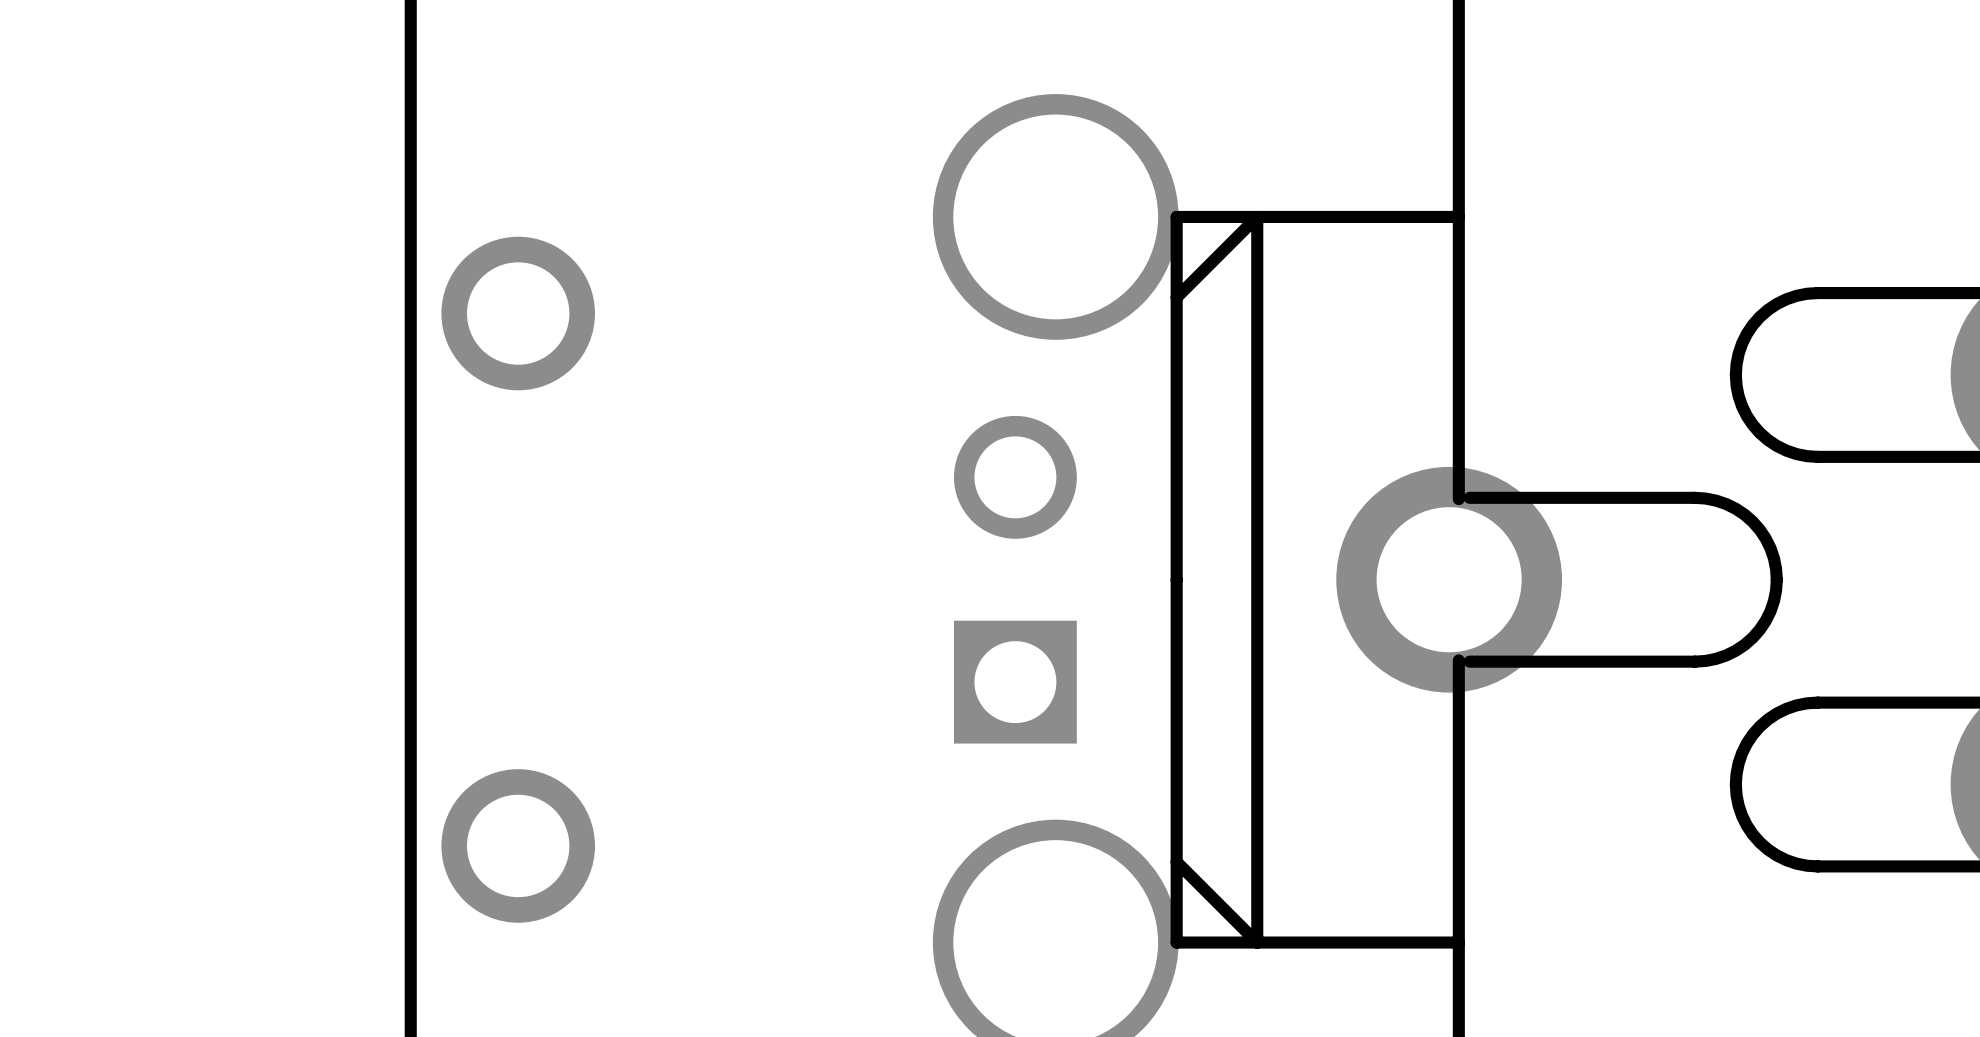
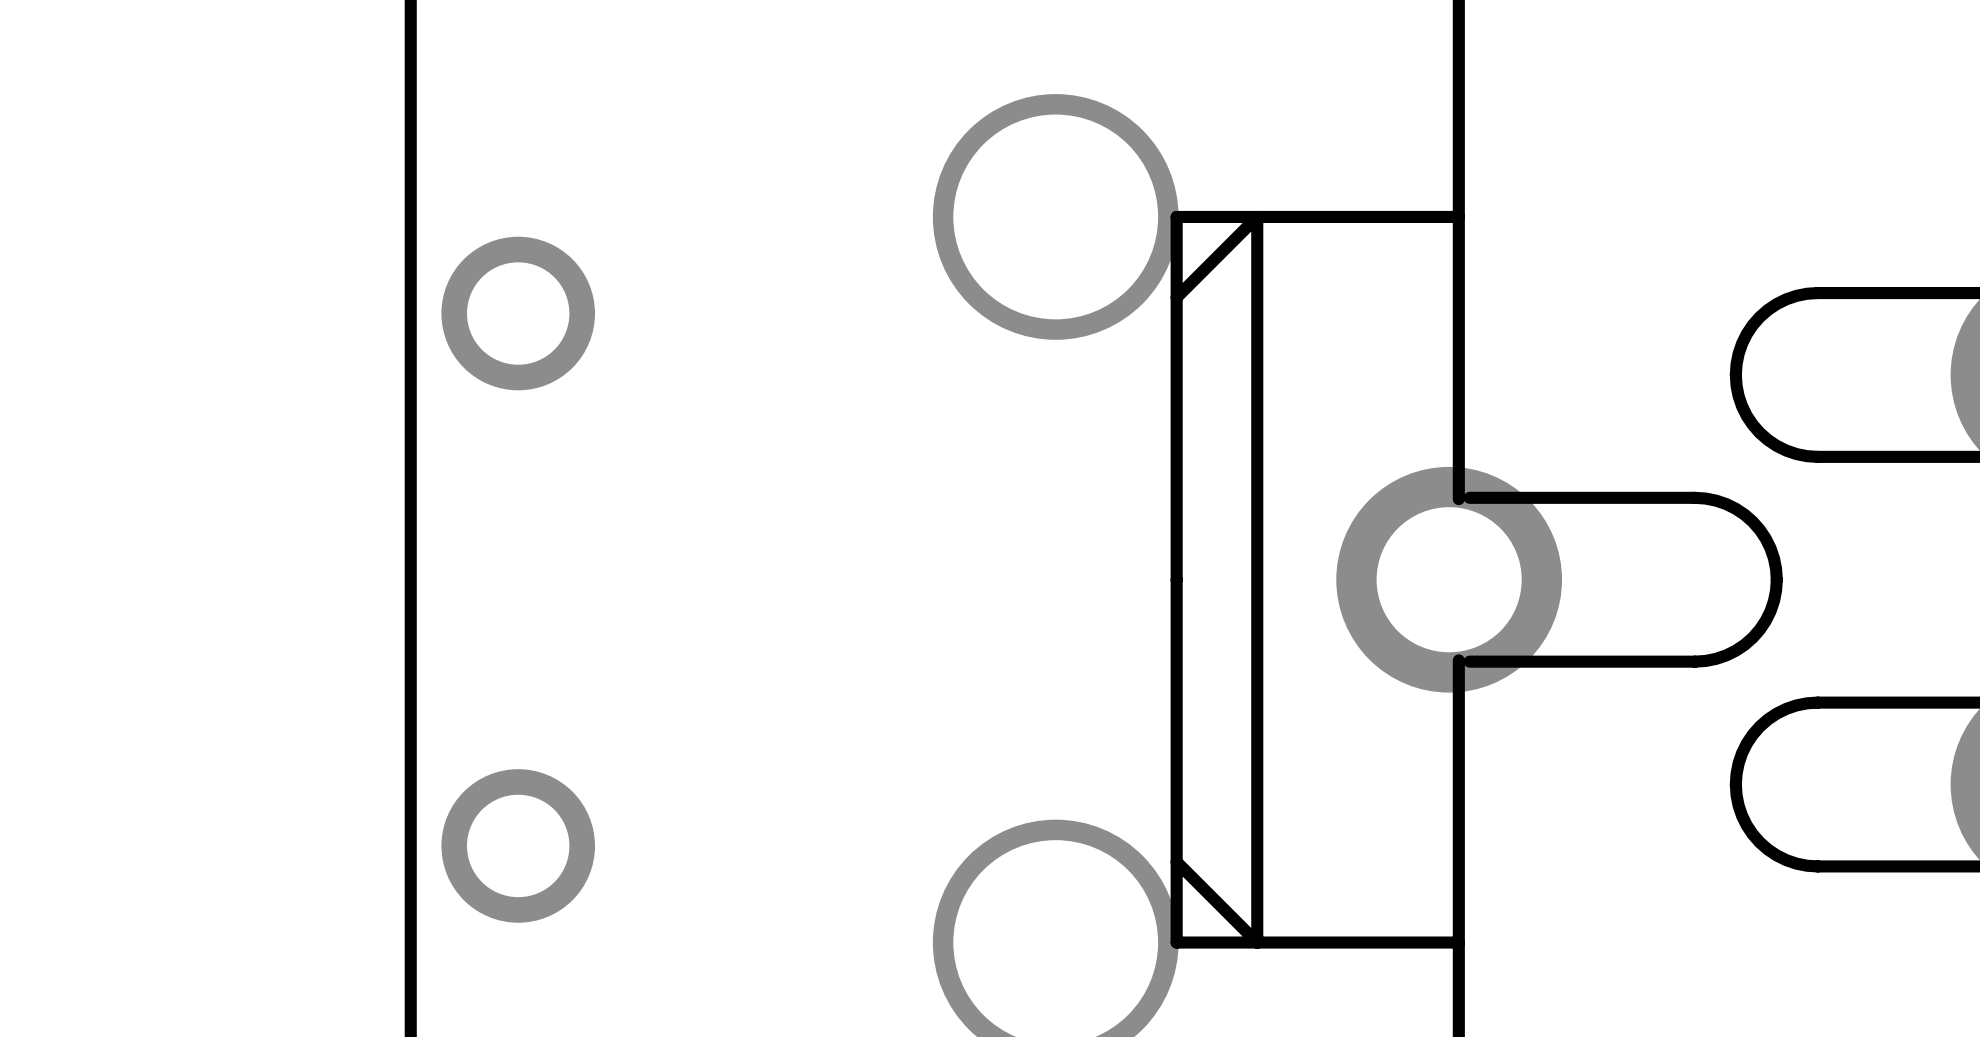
part: (1015, 579) -> none

